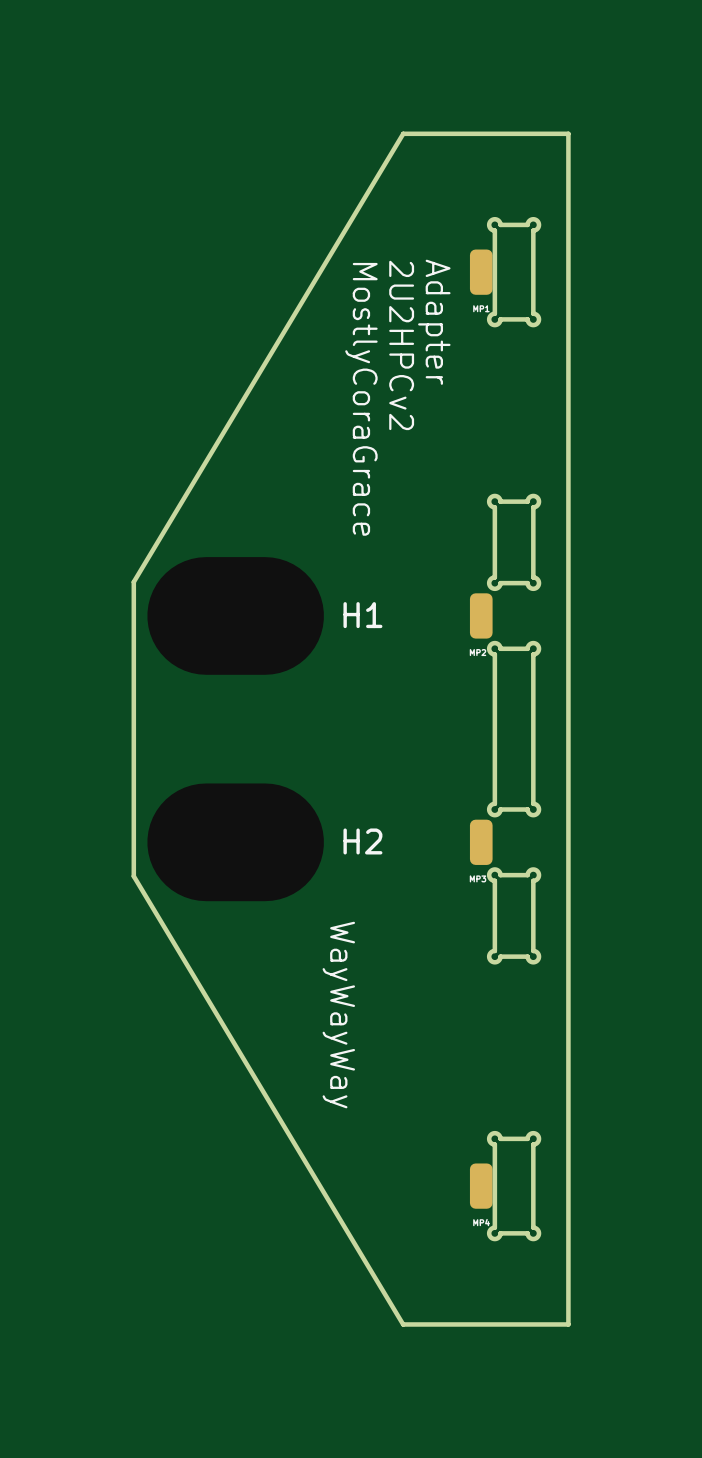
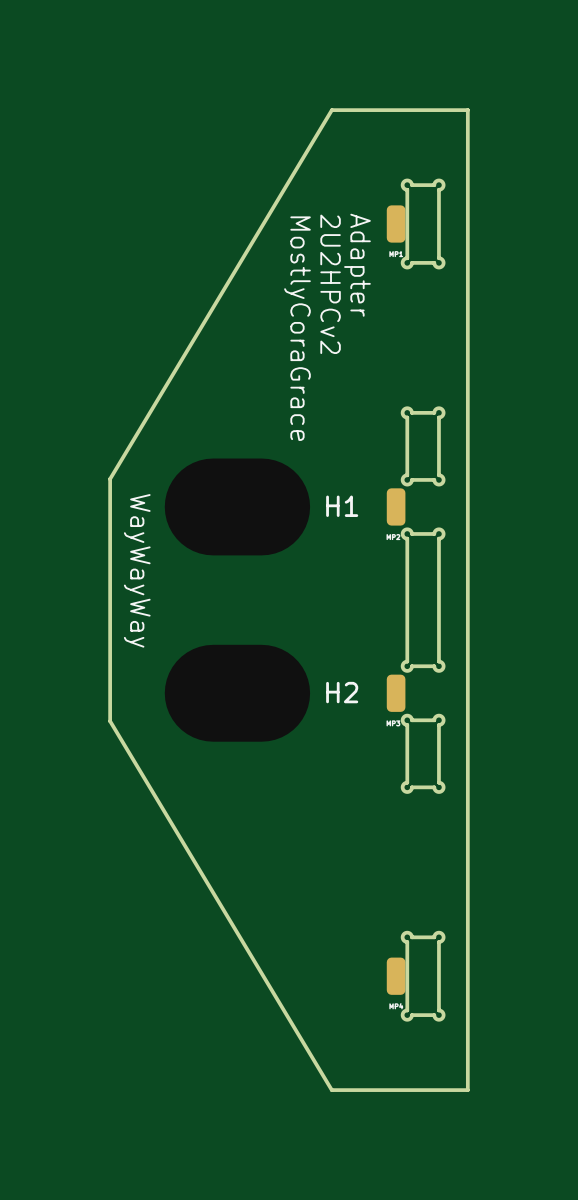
H1 position: (235, 615) -> (237, 506)
H2 position: (235, 842) -> (237, 693)
text position: WayWayWay (338, 1015) -> WayWayWay (137, 570)

